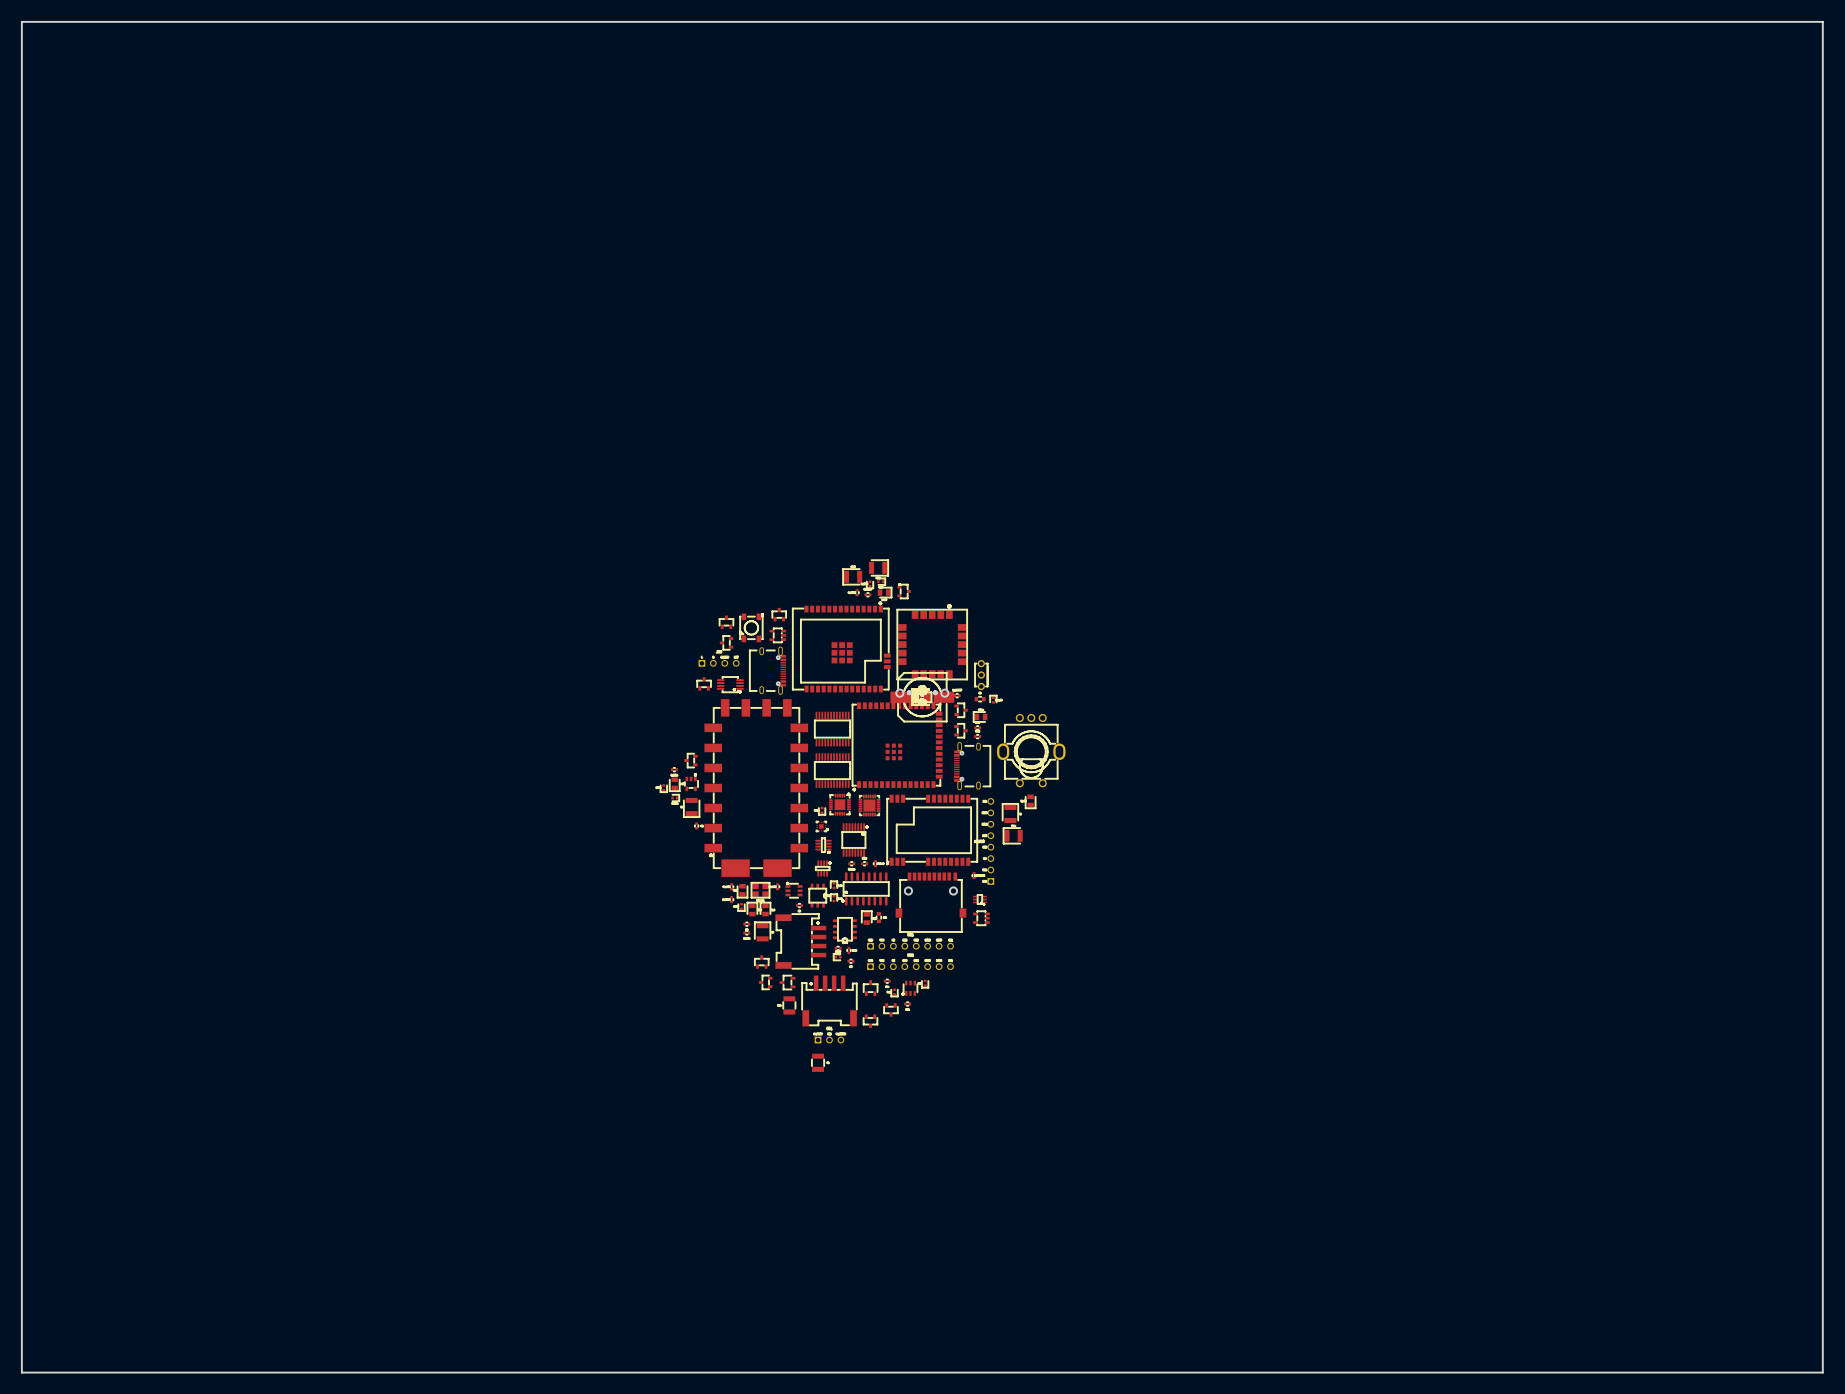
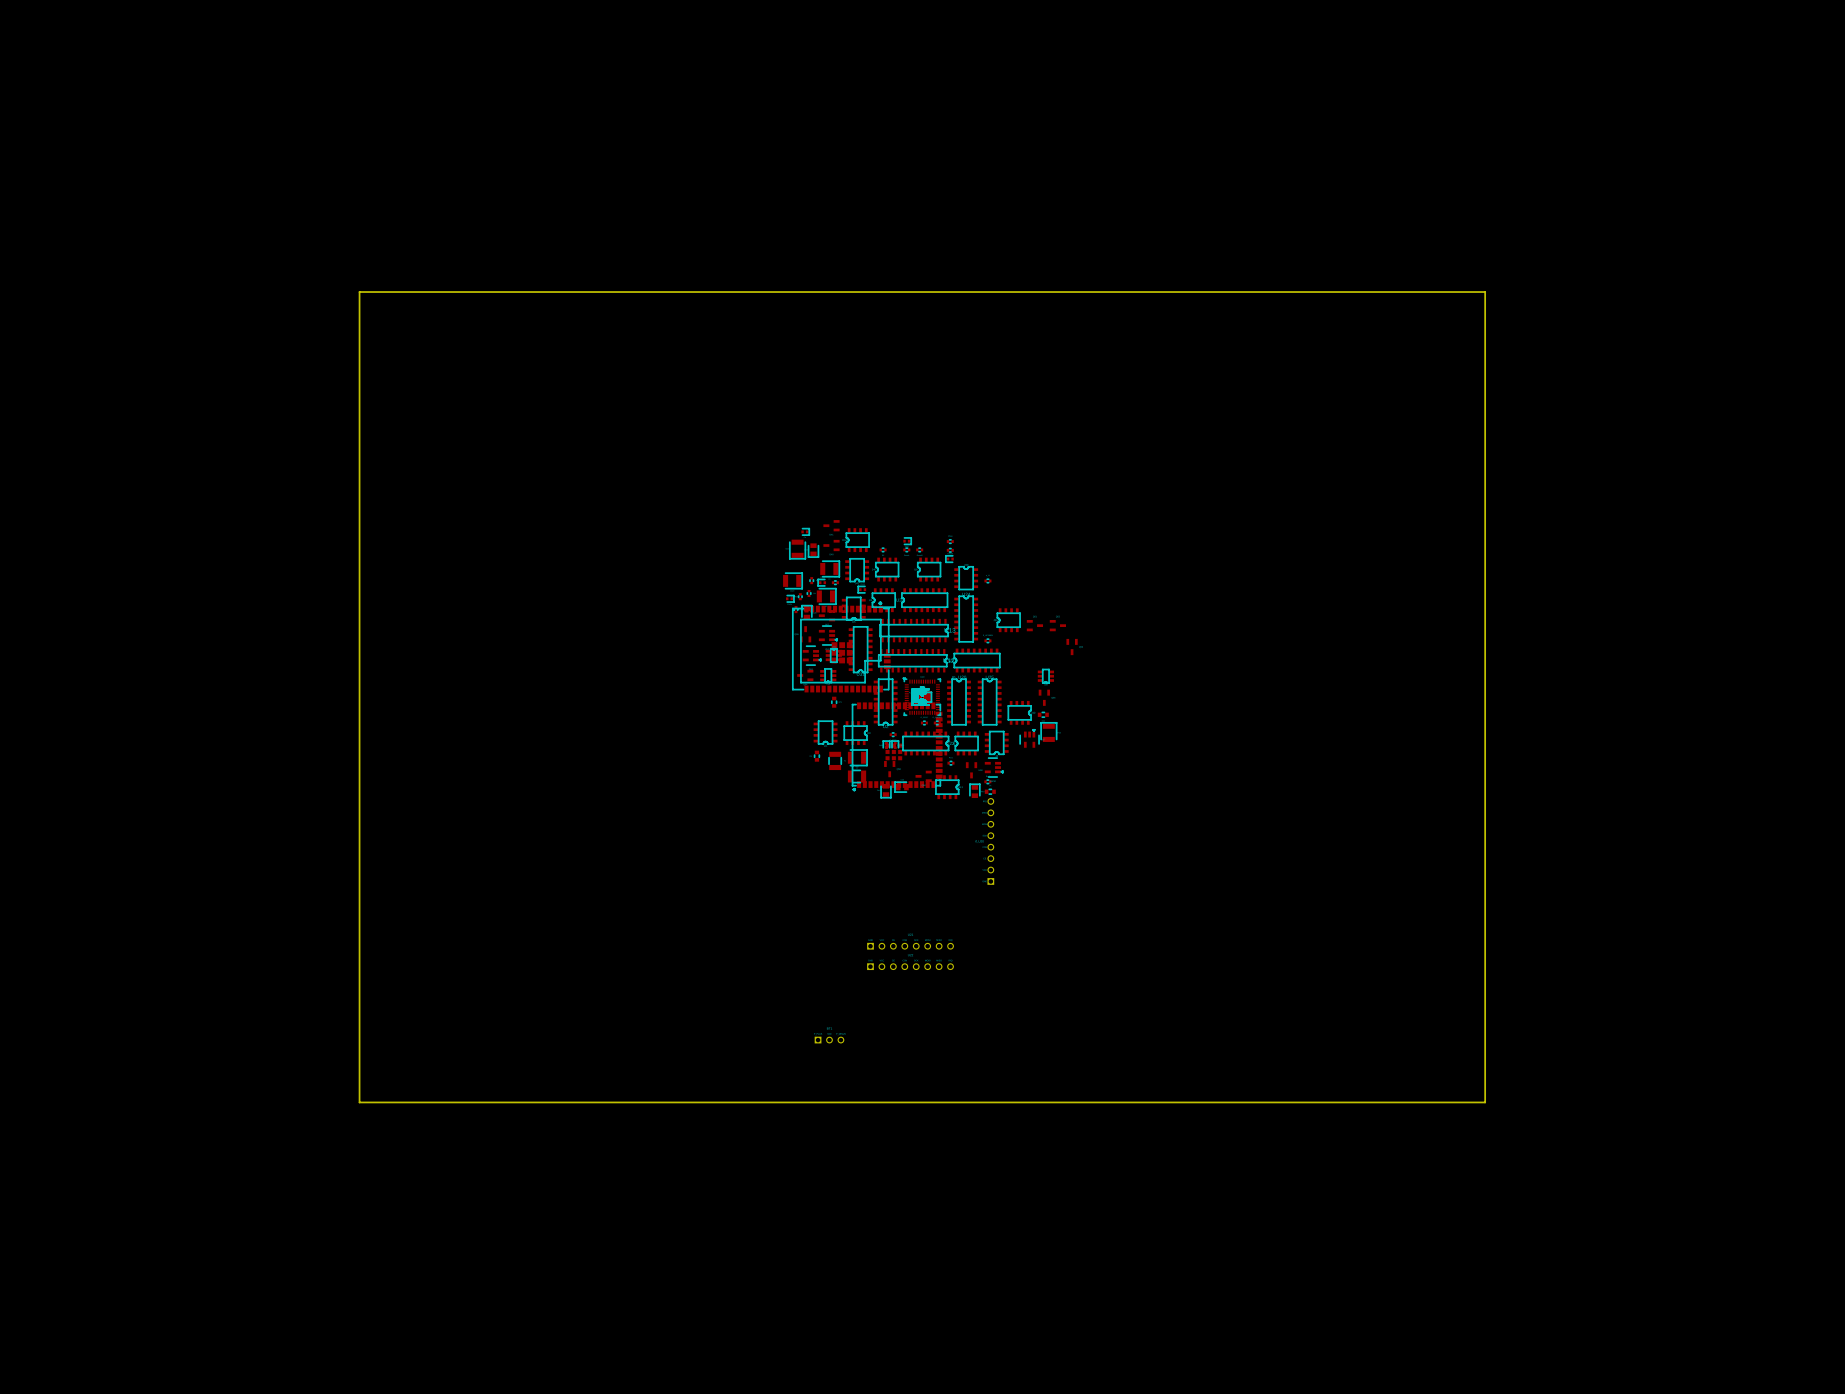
board edge: (21, 21) (1822, 21) (1822, 1372) (21, 1372) (21, 21) -> none
board edge: none -> (359, 292) (1485, 292) (1485, 1102) (359, 1102) (359, 292)
part: none -> (831, 525)
part: none -> (805, 531)
part: none -> (907, 541)
part: none -> (950, 541)
part: none -> (831, 545)
part: none -> (906, 549)
part: none -> (919, 549)
part rotation: 0° (878, 567) -> 90° clockwise (797, 549)
part position: (878, 567) -> (797, 549)
part: none -> (887, 569)
part: none -> (929, 569)
part: none -> (857, 570)
part rotation: 0° (852, 576) -> 180° (792, 580)
part position: (852, 576) -> (792, 580)
part: none -> (987, 580)
part rotation: 0° (881, 581) -> 90° counterclockwise (886, 744)
part position: (881, 581) -> (886, 744)
part rotation: 0° (869, 584) -> 180° (895, 744)
part position: (869, 584) -> (895, 744)
part: (904, 591) -> none
part rotation: 0° (857, 592) -> 90° clockwise (893, 734)
part position: (857, 592) -> (893, 734)
part rotation: 0° (884, 592) -> 90° clockwise (813, 550)
part position: (884, 592) -> (813, 550)
part position: (867, 594) -> (924, 722)
part: none -> (883, 600)
part: none -> (924, 600)
part: none -> (853, 608)
part: (779, 614) -> none
part: none -> (826, 615)
part: none -> (966, 619)
part: none -> (1008, 620)
part: (726, 622) -> none
part: none -> (1034, 625)
part: none -> (1057, 625)
part: (751, 627) -> none
part: none -> (914, 630)
part: none -> (805, 634)
part: (777, 635) -> none
part: none -> (827, 635)
part: (726, 642) -> none
part: (932, 642) -> none
part: none -> (1072, 647)
part: none -> (860, 649)
part: none -> (811, 655)
part: none -> (833, 655)
part footprint: [698, 659, 740, 667] -> [954, 566, 979, 590]
part: none -> (912, 660)
part: none -> (977, 660)
part: (767, 670) -> none
part: none -> (805, 675)
part: none -> (828, 675)
part: (981, 675) -> none
part: none -> (1045, 676)
part: (704, 683) -> none
part: (730, 684) -> none
round board edge: [896, 689, 904, 698] -> none
round board edge: [941, 689, 949, 698] -> none
round board edge: [907, 691, 911, 695] -> none
round board edge: [933, 691, 938, 695] -> none
part position: (957, 695) -> (937, 722)
part: none -> (921, 696)
part: (922, 697) -> none
part: none -> (1044, 697)
part position: (980, 699) -> (990, 791)
part: (993, 699) -> none
part: none -> (885, 702)
part: none -> (959, 702)
part: none -> (989, 702)
part: (961, 710) -> none
part: none -> (1019, 712)
part: none -> (1043, 714)
part rotation: 0° (980, 716) -> 90° clockwise (974, 791)
part position: (980, 716) -> (974, 791)
part position: (977, 727) -> (987, 781)
part: (832, 729) -> none
part: (961, 730) -> none
part: none -> (825, 732)
part: none -> (1048, 732)
part: none -> (855, 733)
part position: (977, 736) -> (950, 763)
part: none -> (1029, 738)
part: none -> (996, 742)
part: none -> (925, 743)
part: none -> (966, 743)
part: (1031, 750) -> none
part: none -> (816, 756)
part: (690, 760) -> none
part: (972, 766) -> none
part: none -> (993, 767)
part position: (674, 769) -> (950, 550)
part: none -> (889, 769)
part: (832, 770) -> none
part: none -> (971, 770)
part: none -> (923, 776)
part: (691, 782) -> none
part rotation: 0° (674, 784) -> 180° (806, 612)
part position: (674, 784) -> (806, 612)
part rotation: 0° (663, 788) -> 90° counterclockwise (790, 598)
part position: (663, 788) -> (790, 598)
part: (756, 788) -> none
part rotation: 0° (675, 798) -> 180° (949, 559)
part position: (675, 798) -> (949, 559)
part: (1030, 801) -> none
part: (839, 804) -> none
part: (869, 805) -> none
part rotation: 0° (691, 807) -> 90° counterclockwise (826, 596)
part position: (691, 807) -> (826, 596)
part: (822, 810) -> none
part rotation: 0° (1010, 813) -> 90° clockwise (857, 757)
part position: (1010, 813) -> (857, 757)
part rotation: 0° (696, 825) -> 90° clockwise (835, 582)
part position: (696, 825) -> (835, 582)
part: (822, 826) -> none
part: (932, 830) -> none
part: (1013, 835) -> none
part: (855, 839) -> none
part: (823, 845) -> none
part: (851, 863) -> none
part: (864, 863) -> none
part: (875, 863) -> none
part: (823, 868) -> none
part rotation: 0° (974, 875) -> 90° clockwise (987, 640)
part position: (974, 875) -> (987, 640)
part footprint: [809, 883, 827, 908] -> [935, 775, 959, 800]
part rotation: 0° (834, 885) -> 90° counterclockwise (862, 589)
part position: (834, 885) -> (862, 589)
part: (731, 886) -> none
part: (777, 886) -> none
part: (865, 888) -> none
part position: (742, 890) -> (885, 790)
part: (760, 890) -> none
part: (793, 890) -> none
part: (834, 898) -> none
part position: (731, 899) -> (800, 596)
part: (979, 899) -> none
part: (930, 902) -> none
part position: (799, 905) -> (883, 549)
part rotation: 0° (741, 907) -> 90° clockwise (821, 582)
part position: (741, 907) -> (821, 582)
part rotation: 0° (752, 909) -> 90° counterclockwise (901, 787)
part position: (752, 909) -> (901, 787)
part: (765, 909) -> none
part: (866, 917) -> none
part position: (878, 917) -> (834, 702)
part: (981, 918) -> none
part rotation: 0° (746, 924) -> 90° clockwise (809, 593)
part position: (746, 924) -> (809, 593)
part rotation: 0° (844, 929) -> 90° clockwise (857, 540)
part position: (844, 929) -> (857, 540)
part rotation: 0° (762, 931) -> 90° clockwise (829, 568)
part position: (762, 931) -> (829, 568)
part rotation: 0° (746, 932) -> 90° clockwise (796, 609)
part position: (746, 932) -> (796, 609)
part: (800, 941) -> none
part: (838, 948) -> none
part: (848, 950) -> none
part: (837, 957) -> none
part rotation: 0° (850, 961) -> 90° clockwise (811, 580)
part position: (850, 961) -> (811, 580)
part: (761, 962) -> none
part: (887, 981) -> none
part: (765, 982) -> none
part: (787, 982) -> none
part: (925, 983) -> none
part: (870, 988) -> none
part: (909, 988) -> none
part: (894, 992) -> none
part: (829, 1001) -> none
part: (907, 1004) -> none
part rotation: 0° (789, 1005) -> 90° clockwise (857, 776)
part position: (789, 1005) -> (857, 776)
part: (890, 1010) -> none
part: (870, 1021) -> none
part position: (818, 1062) -> (835, 760)

